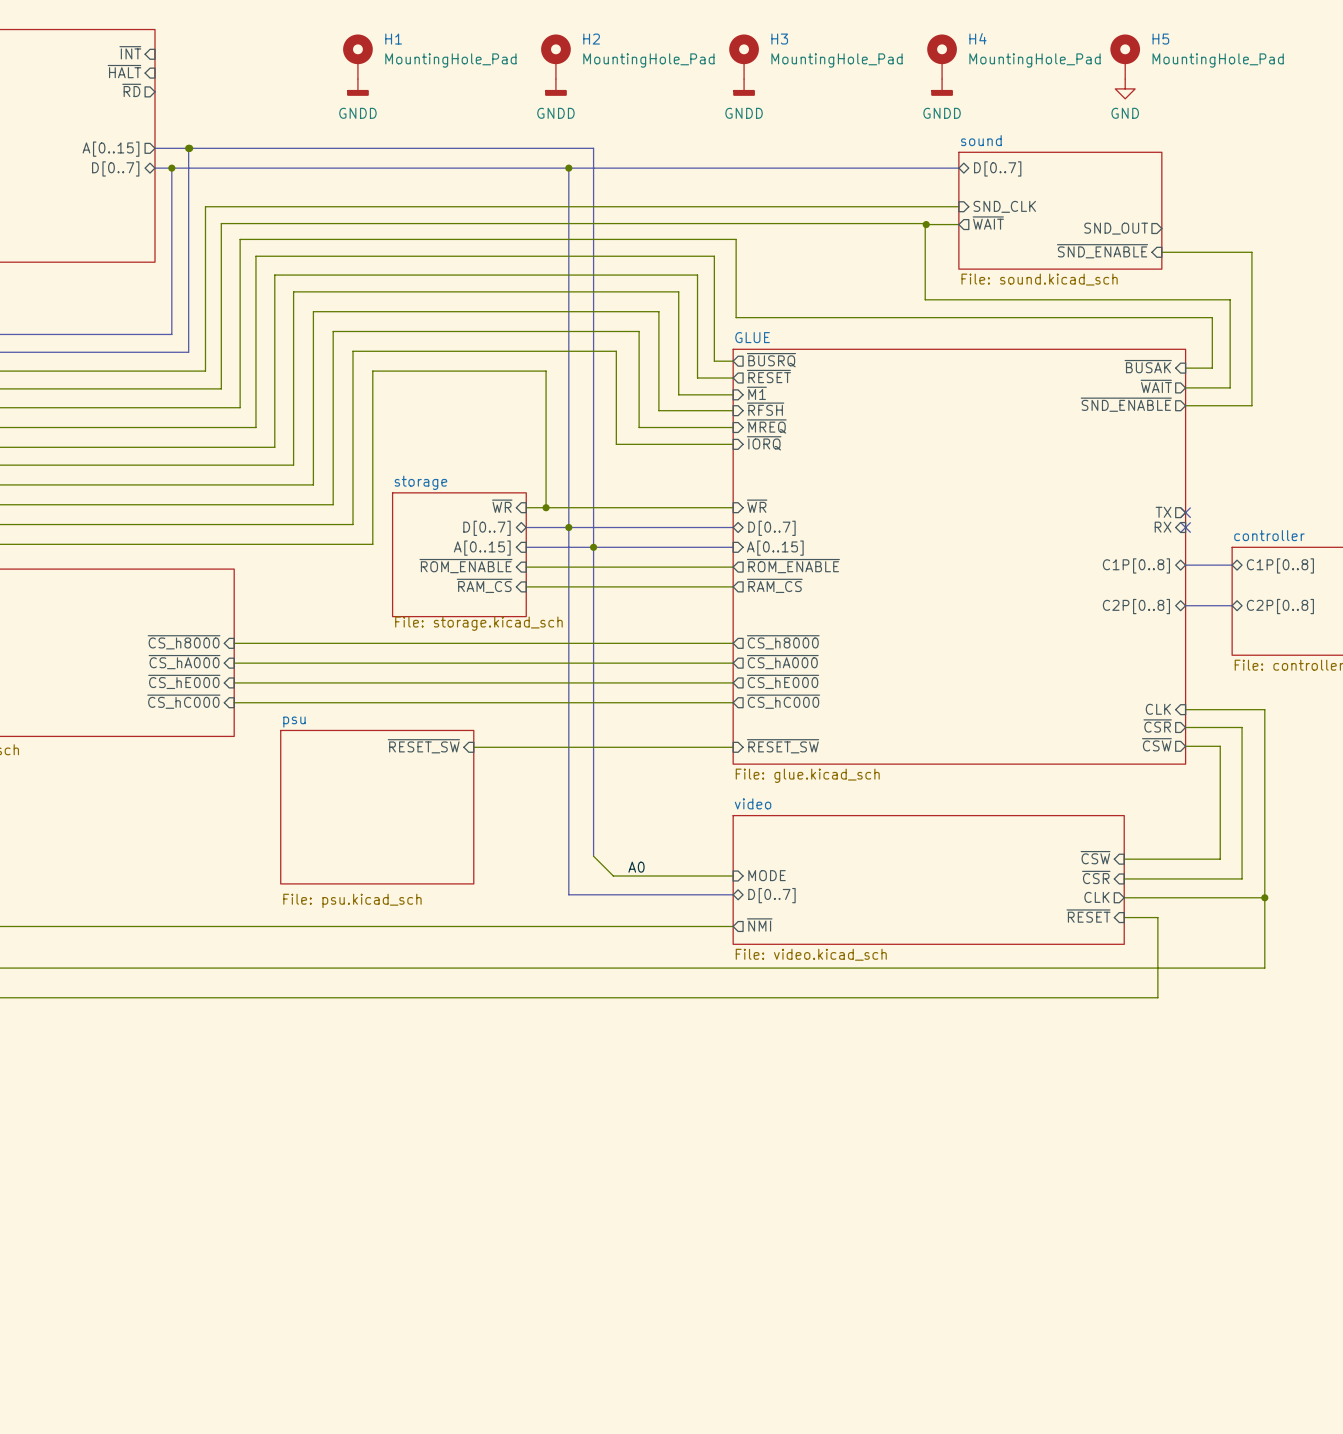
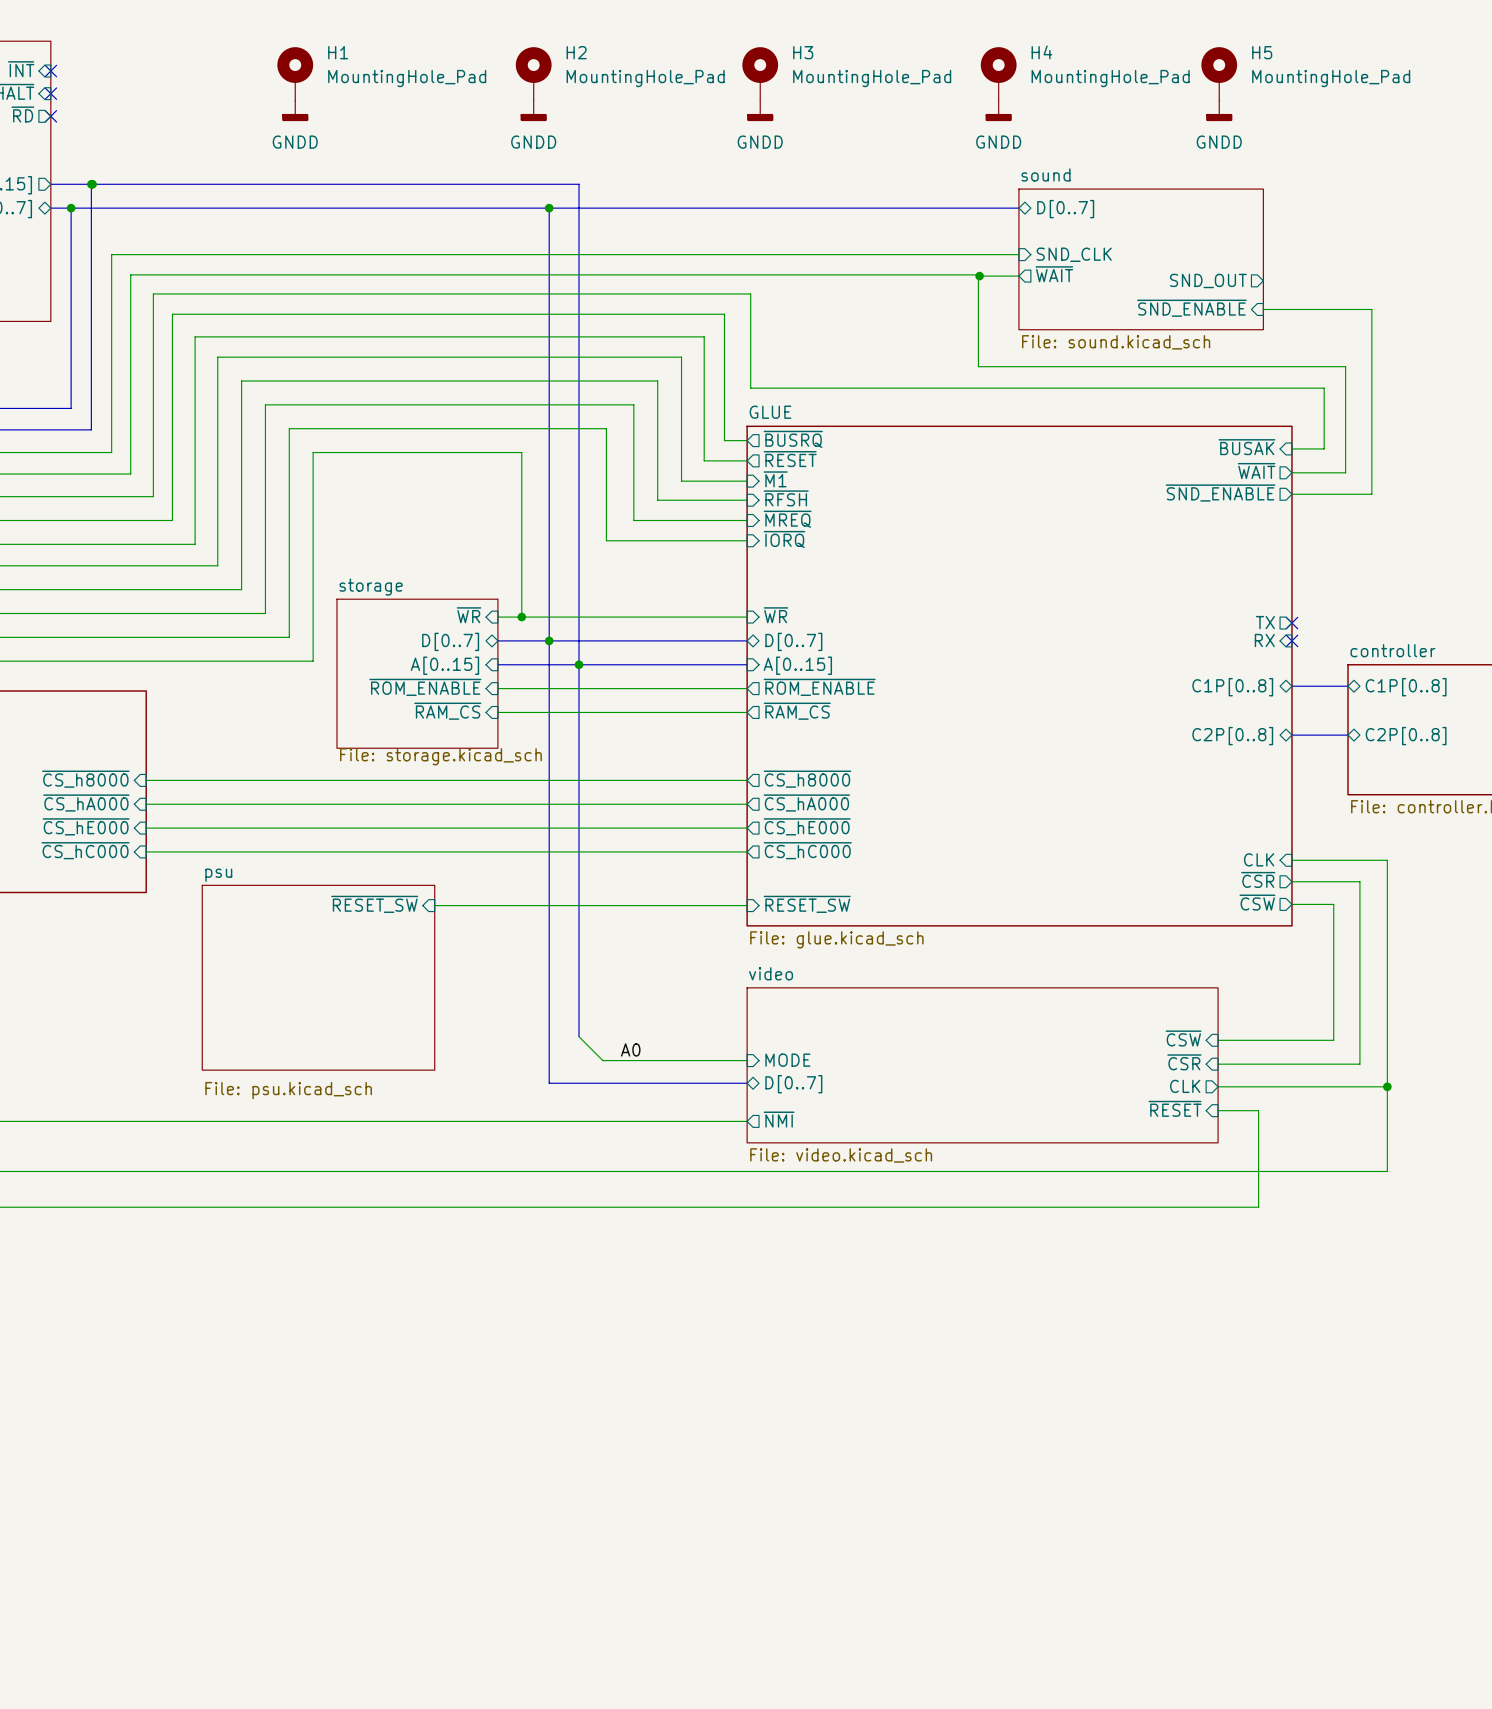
no-connect mark: none -> (50, 71)
no-connect mark: none -> (50, 93)
power symbol: GND (1125, 88) -> GNDD (1219, 110)
no-connect mark: none -> (50, 116)

